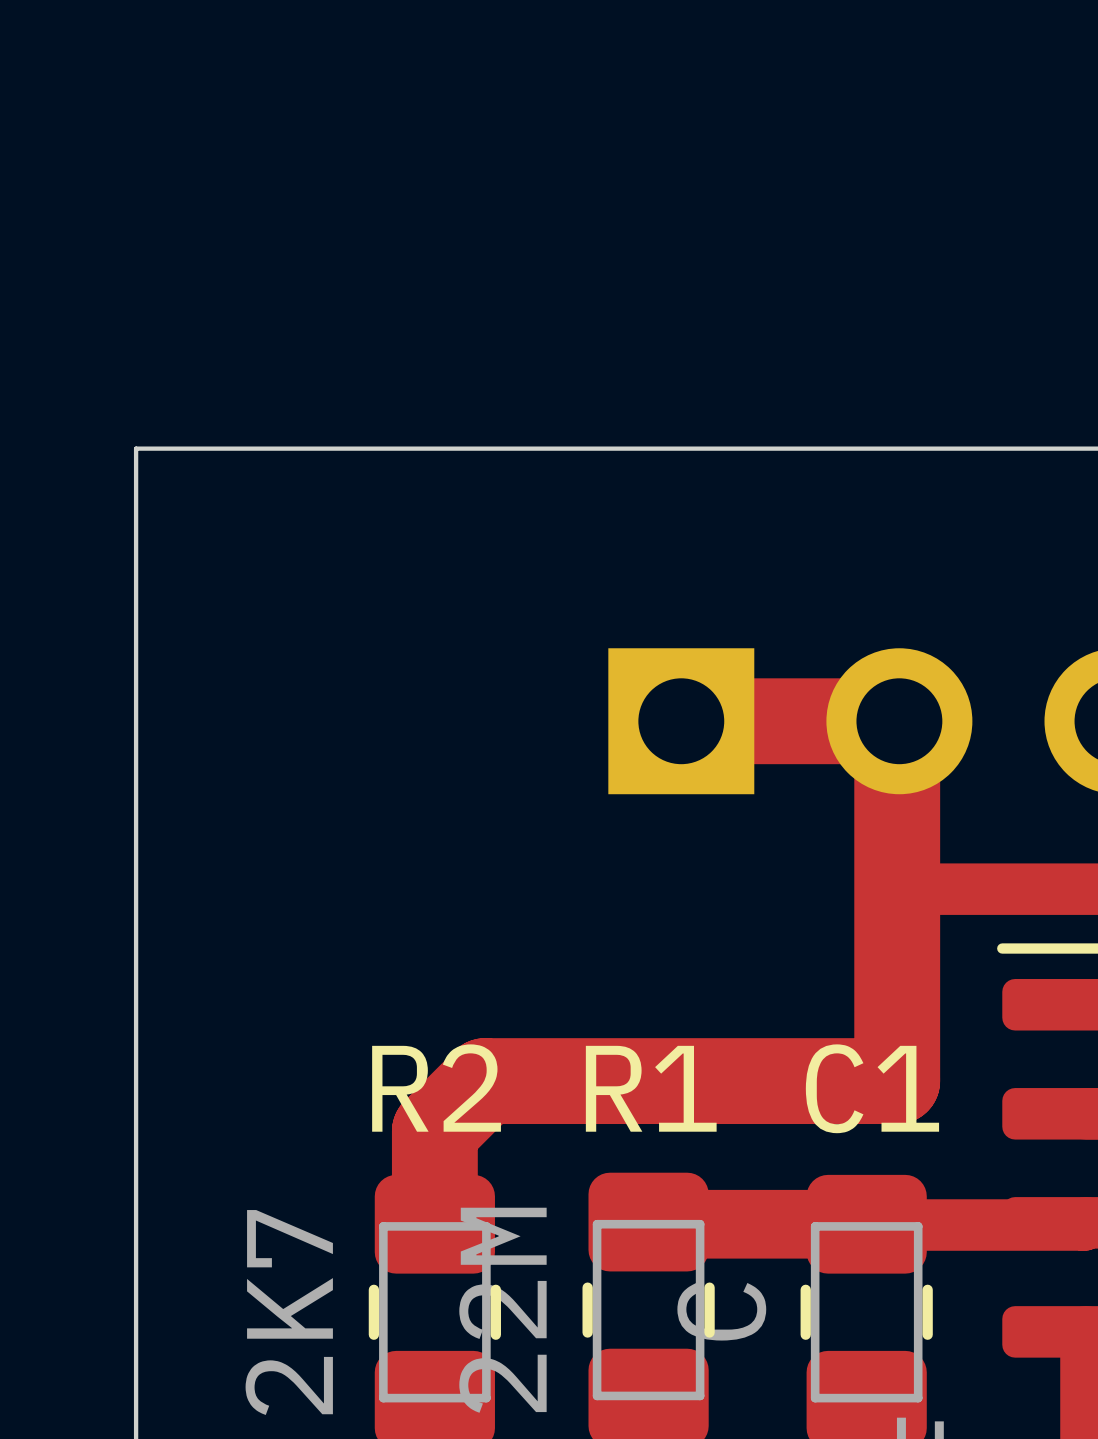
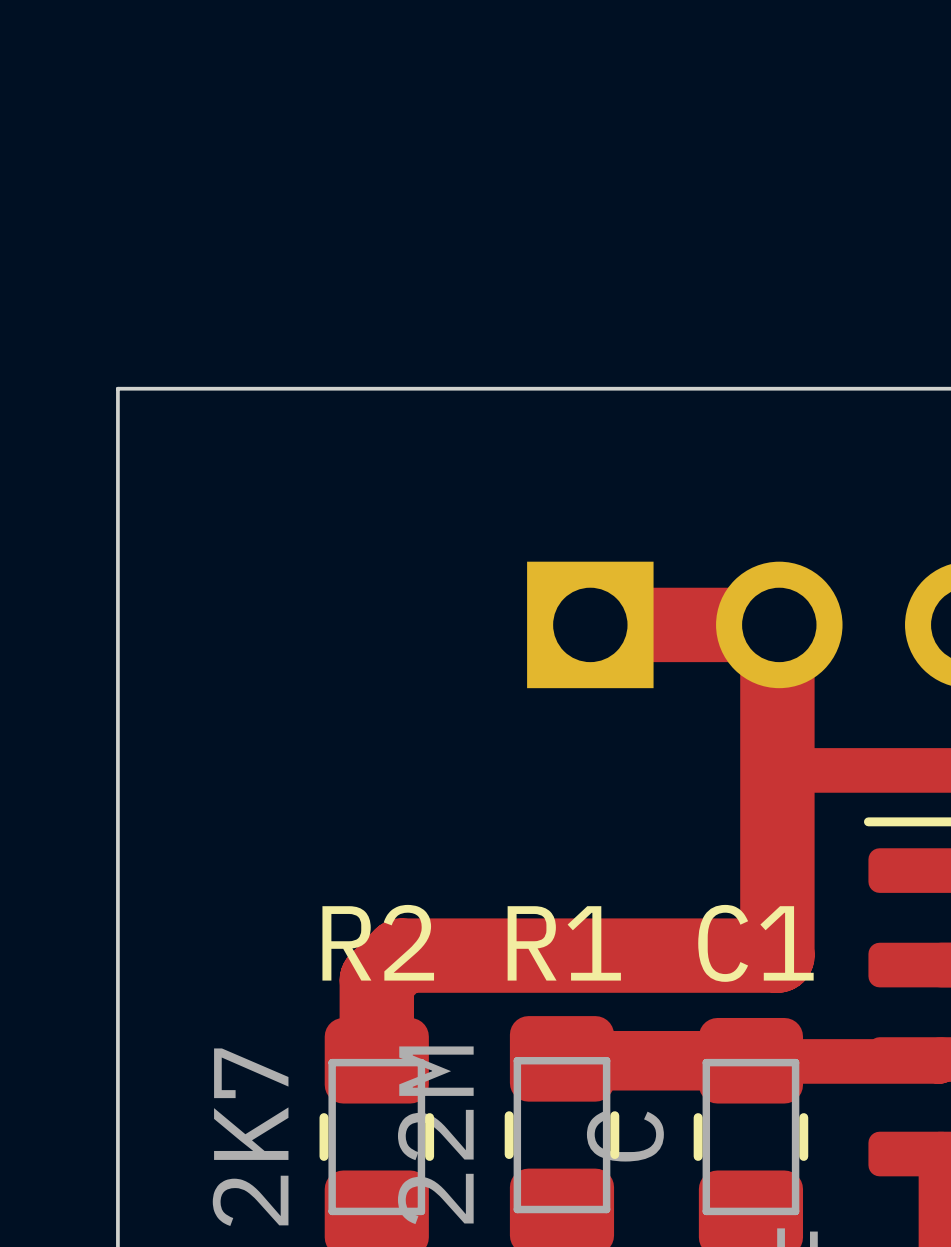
track: (897, 1081) (485, 1081) (463, 1102) -> (777, 936) (777, 955) (401, 955)

